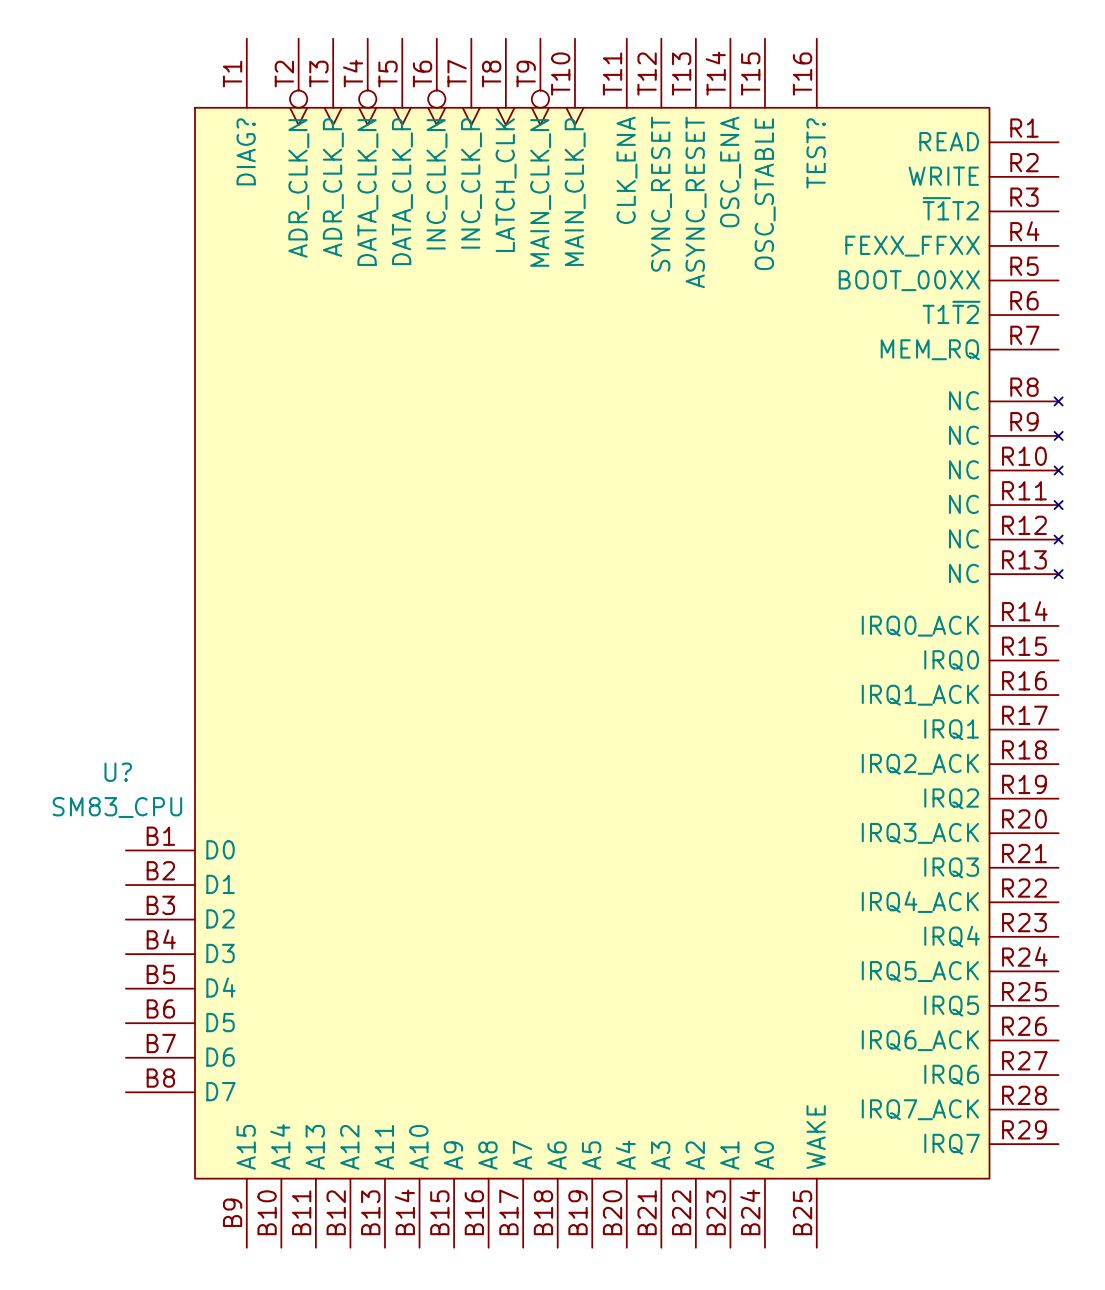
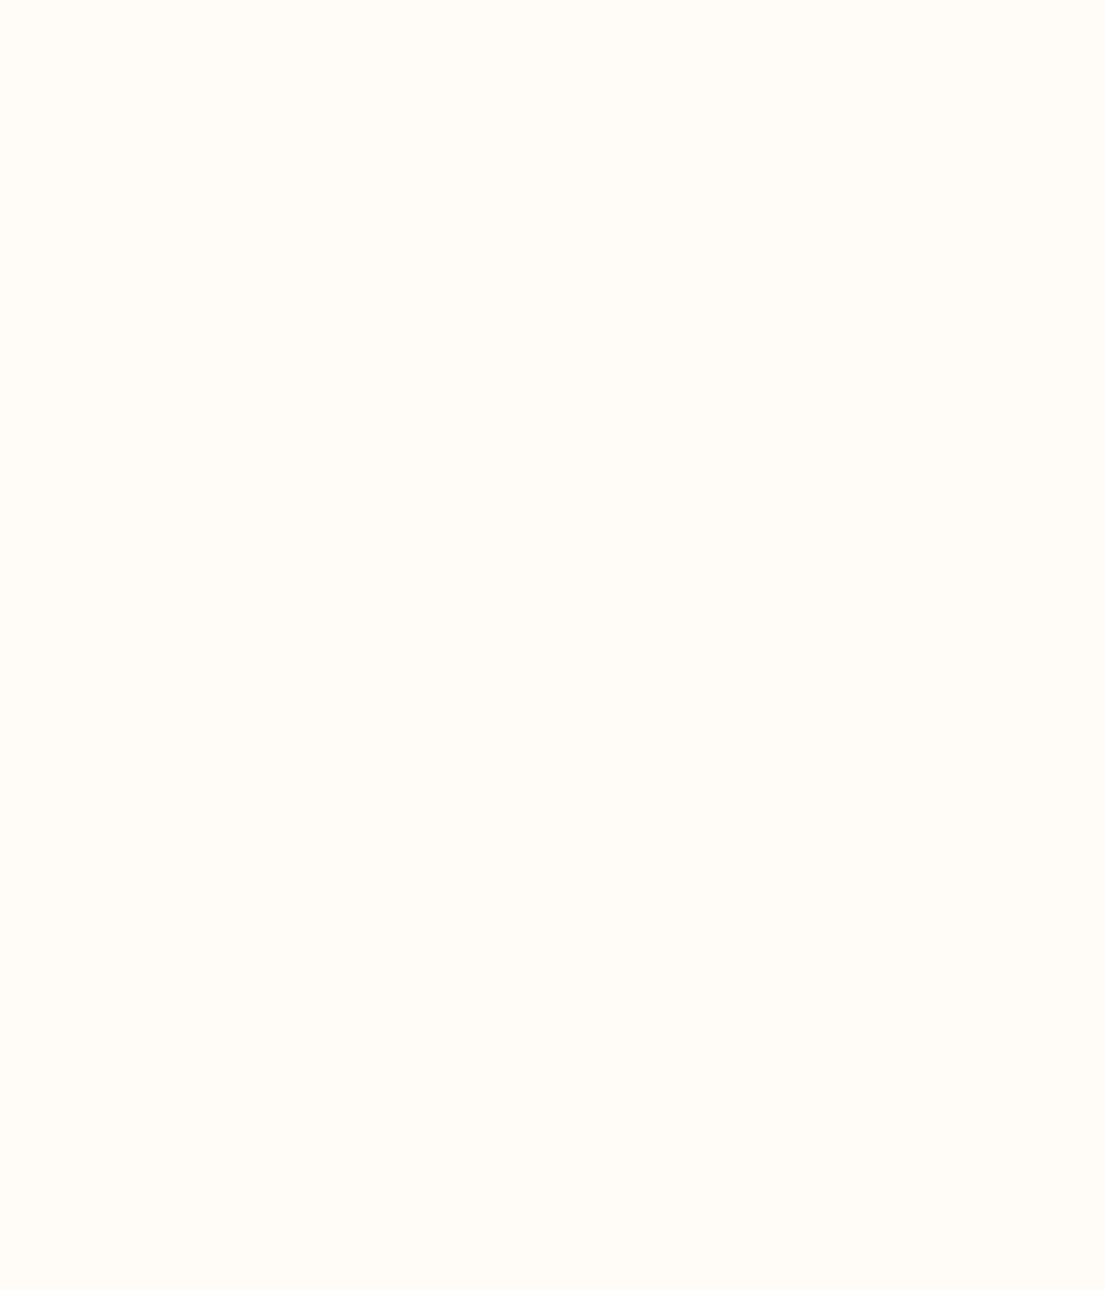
U?: SM83_CPU (594, 643) -> none

